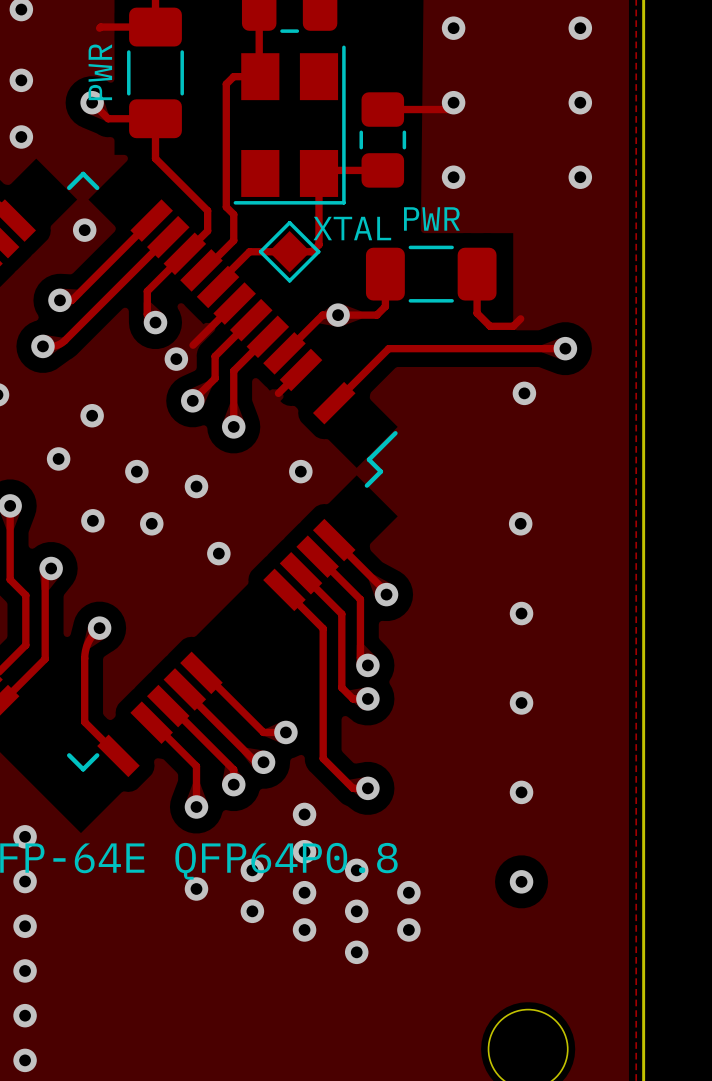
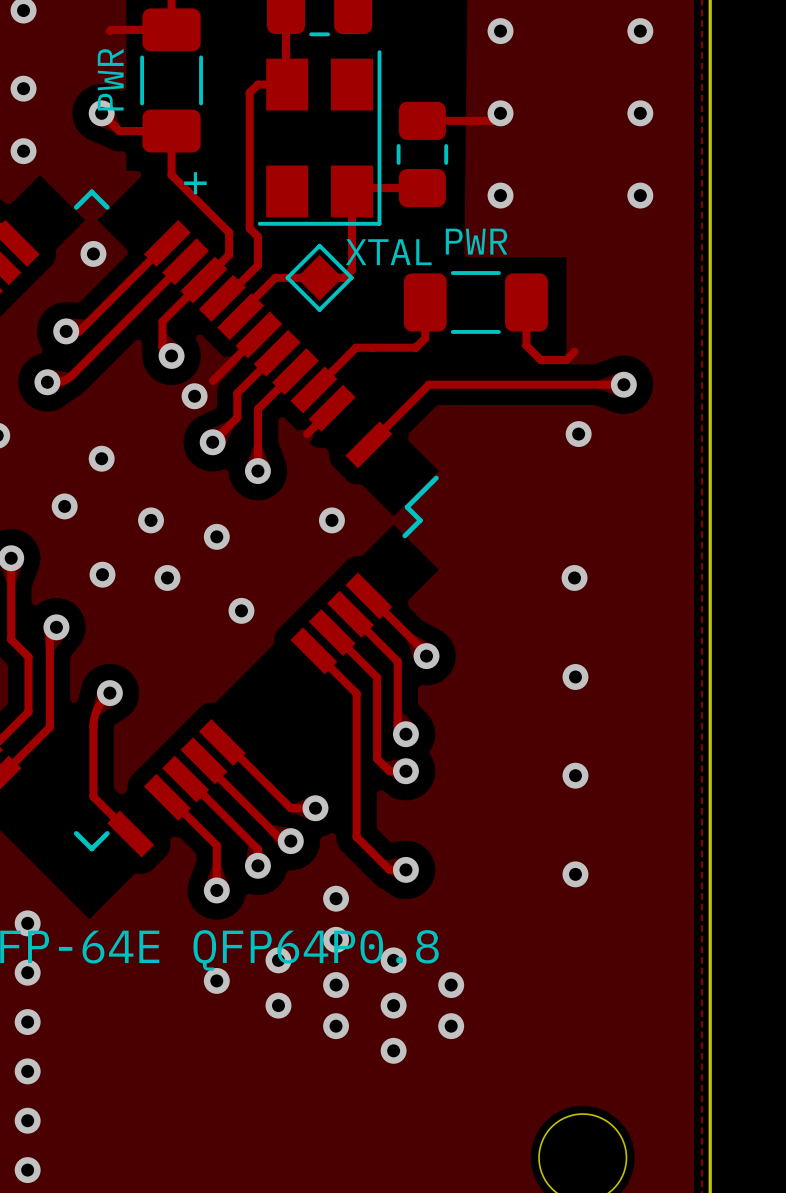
part text: none -> + (195, 183)
via: (338, 315) -> none
via: (521, 881) -> none

